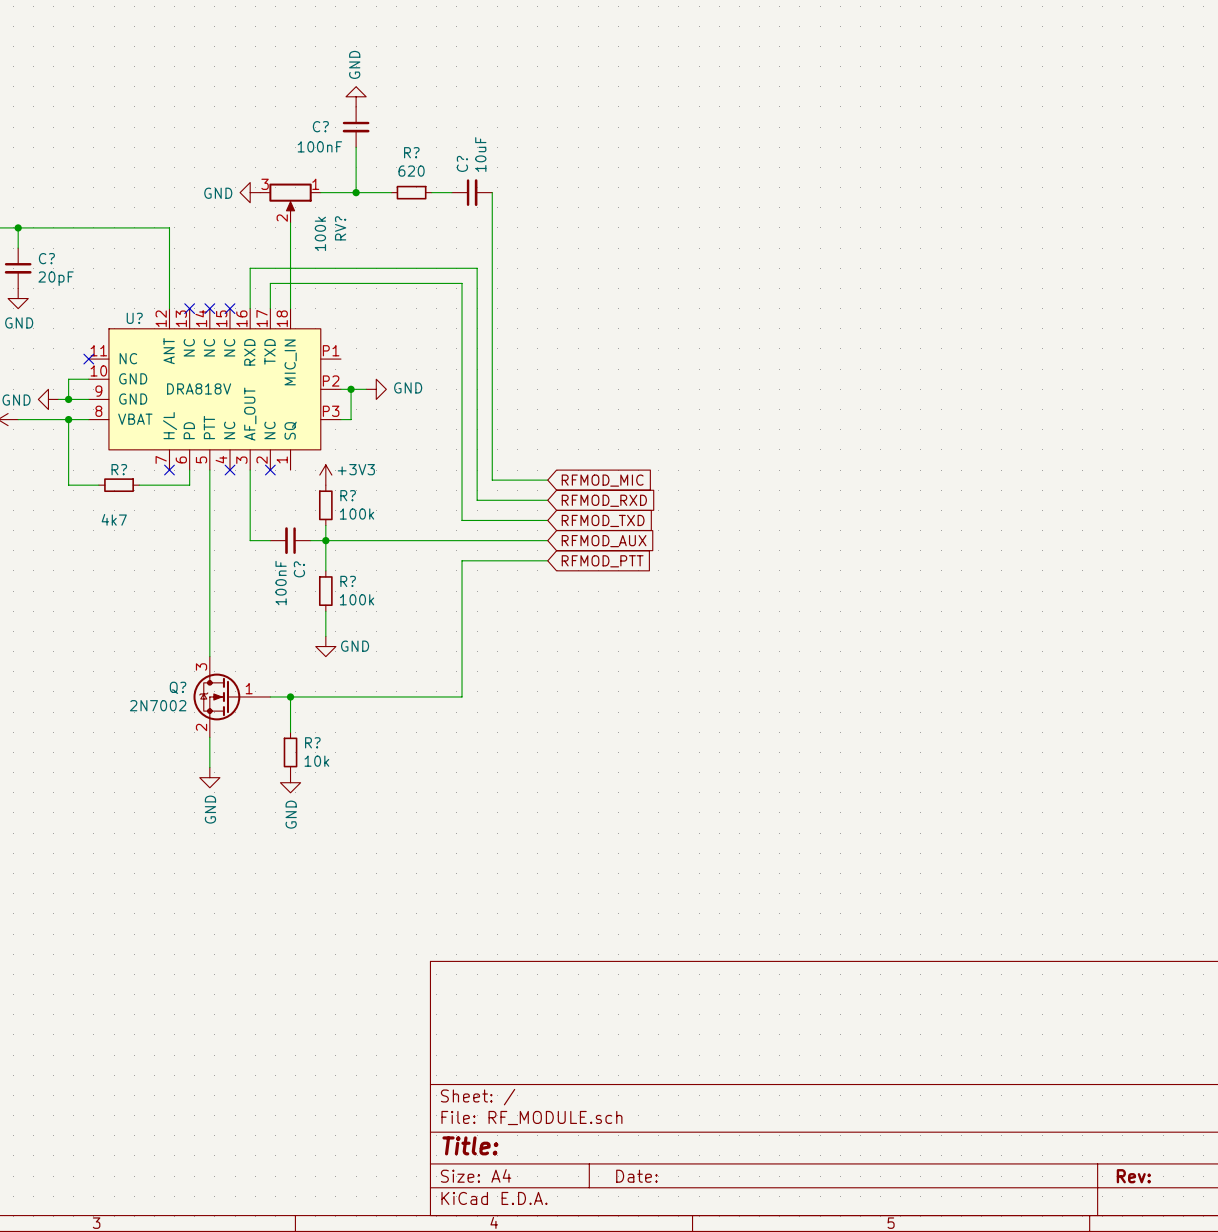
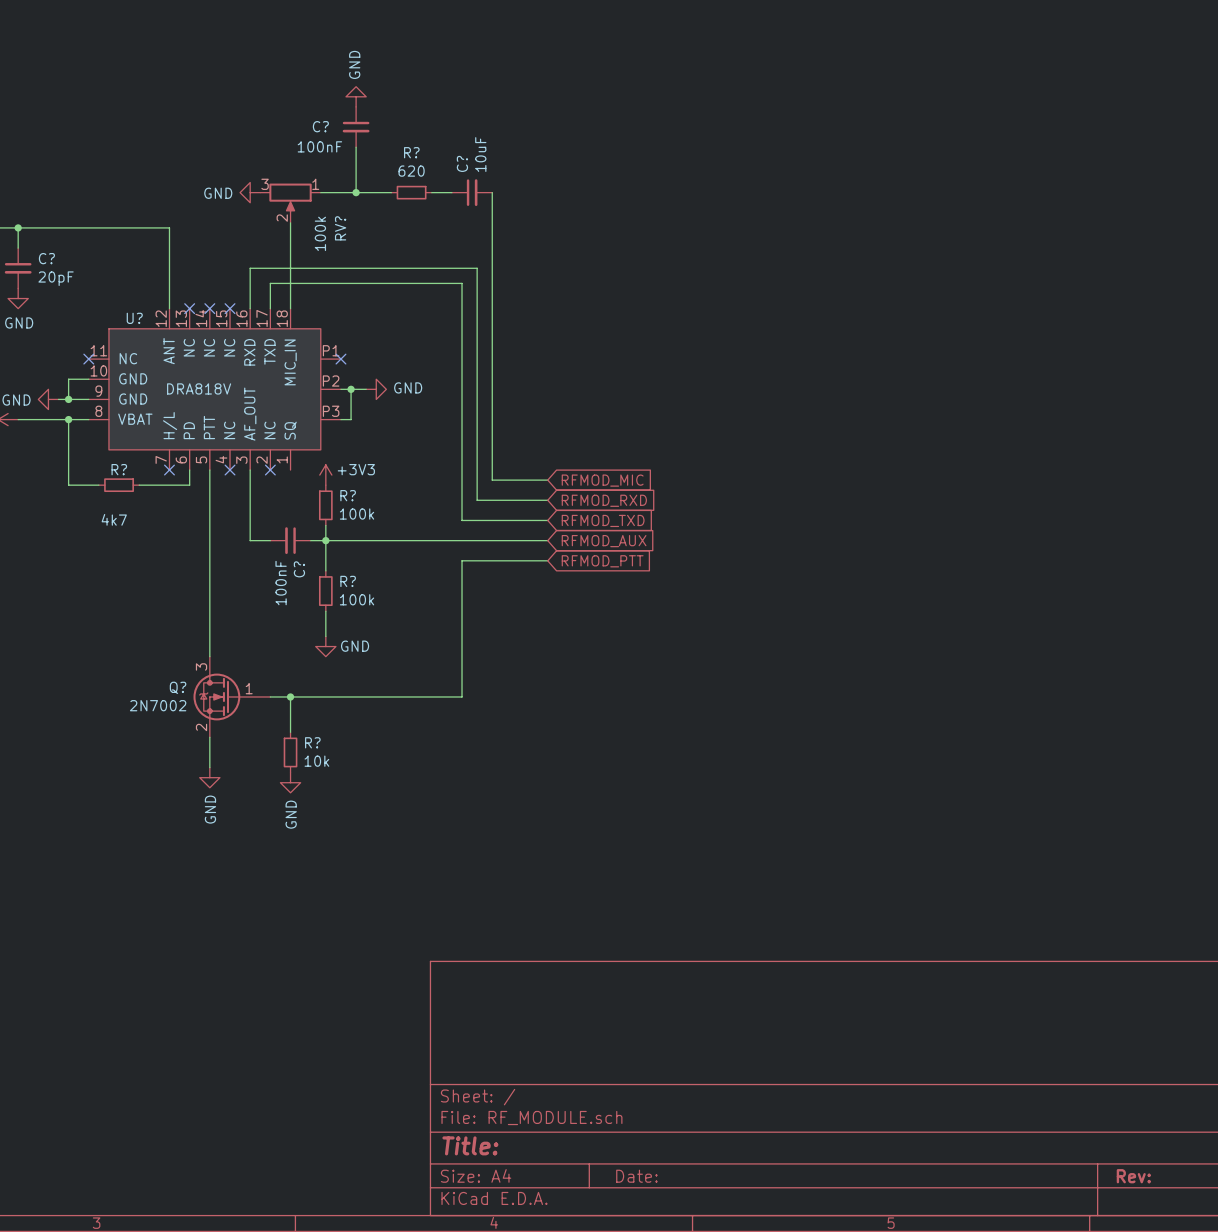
no-connect mark: none -> (340, 359)

